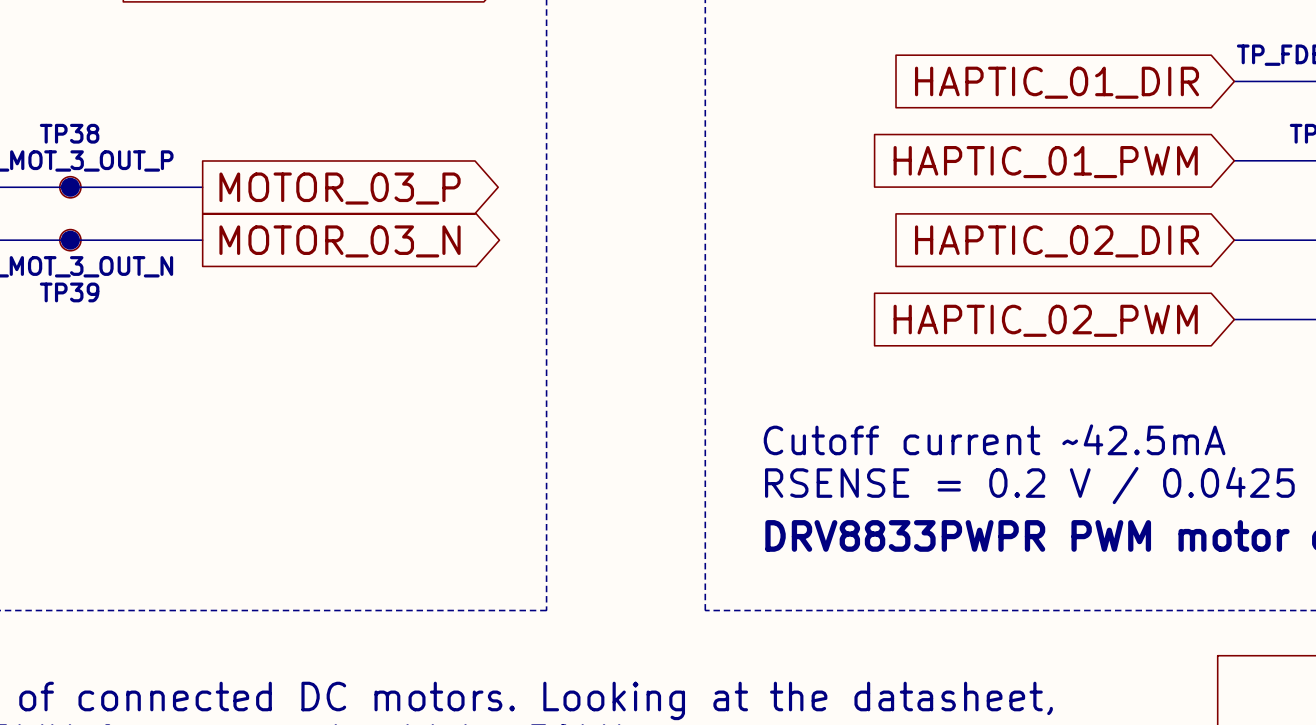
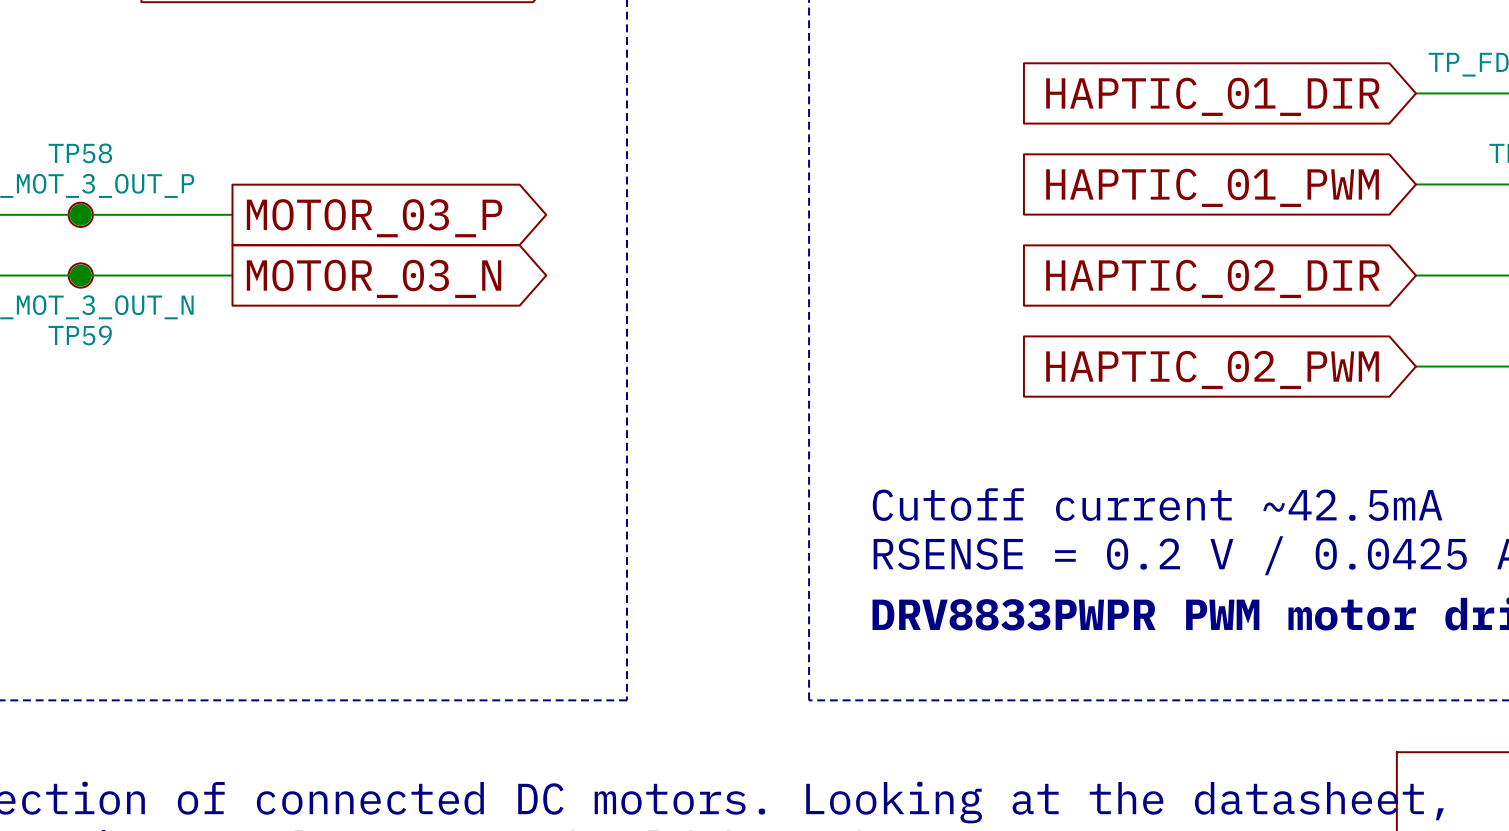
TP38 name: TP38 (69, 133) -> TP58 (80, 153)
TP39 name: TP39 (69, 292) -> TP59 (80, 335)

